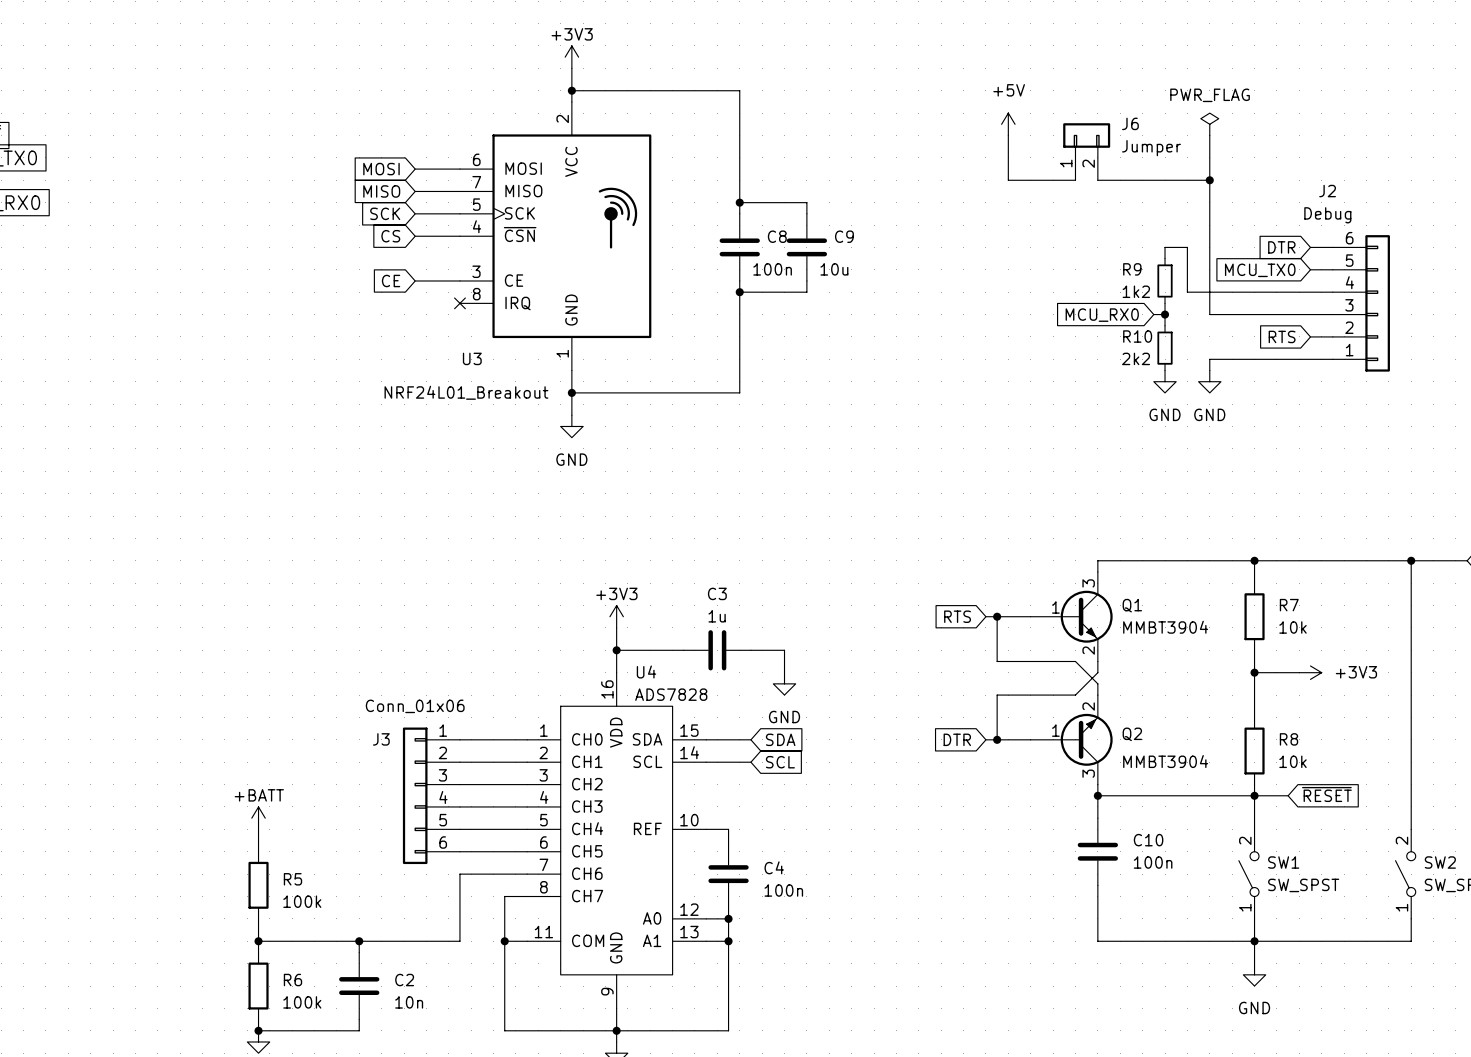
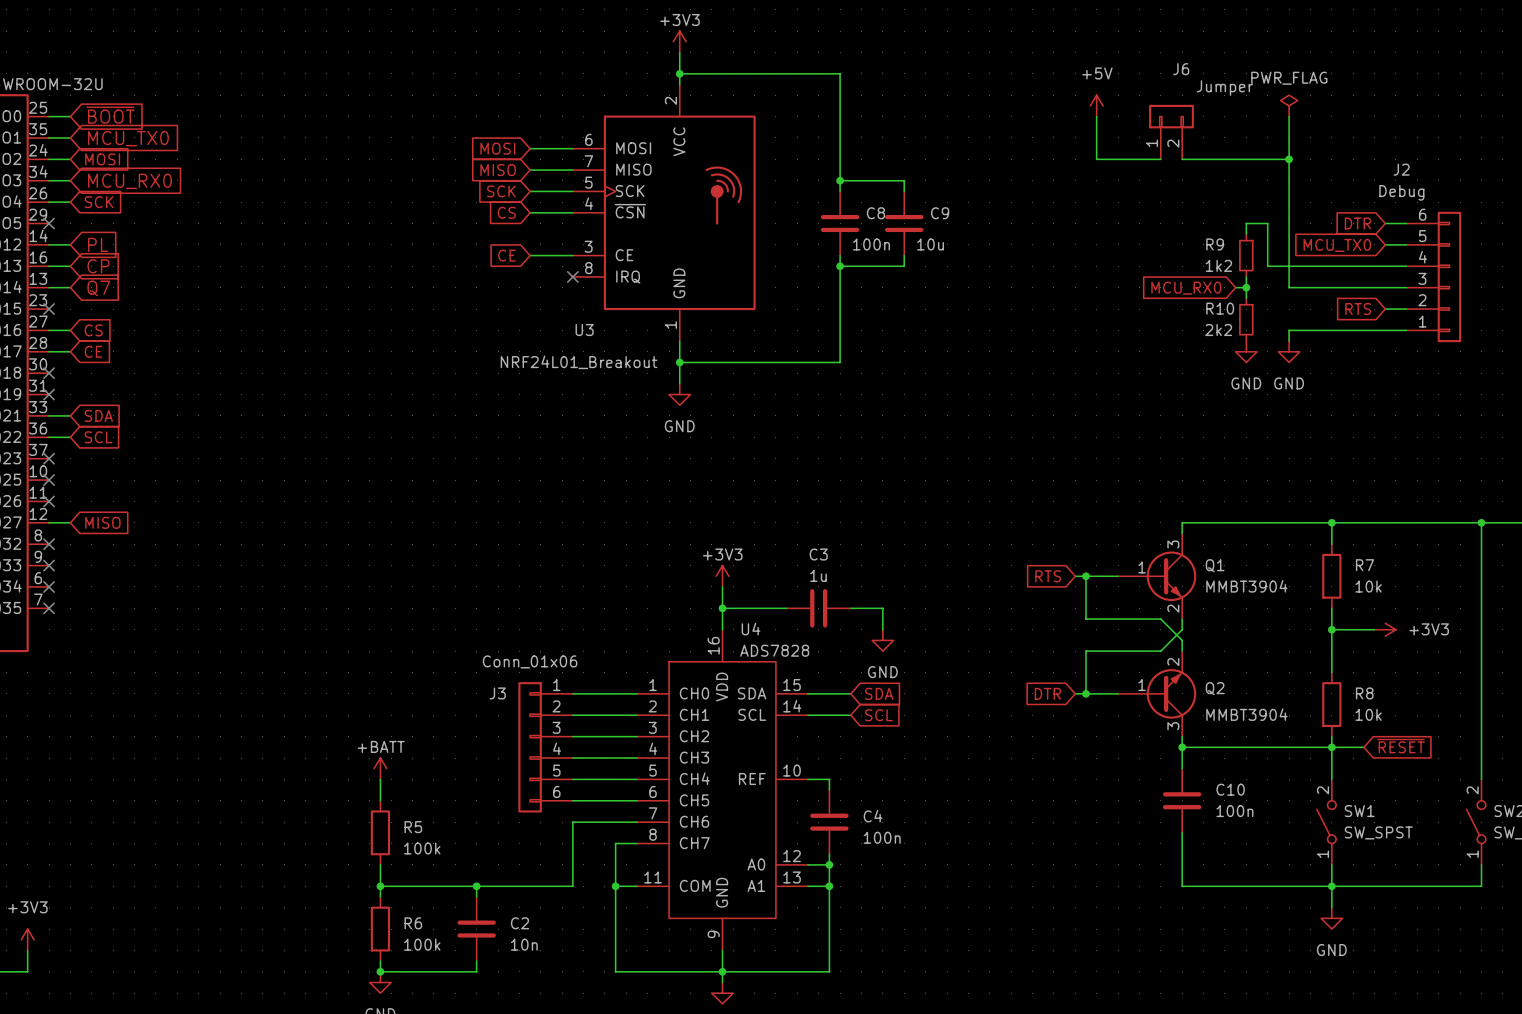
J6 name position: J6 (1130, 123) -> J6 (1181, 69)
J6 value position: Jumper (1151, 148) -> Jumper (1224, 88)

